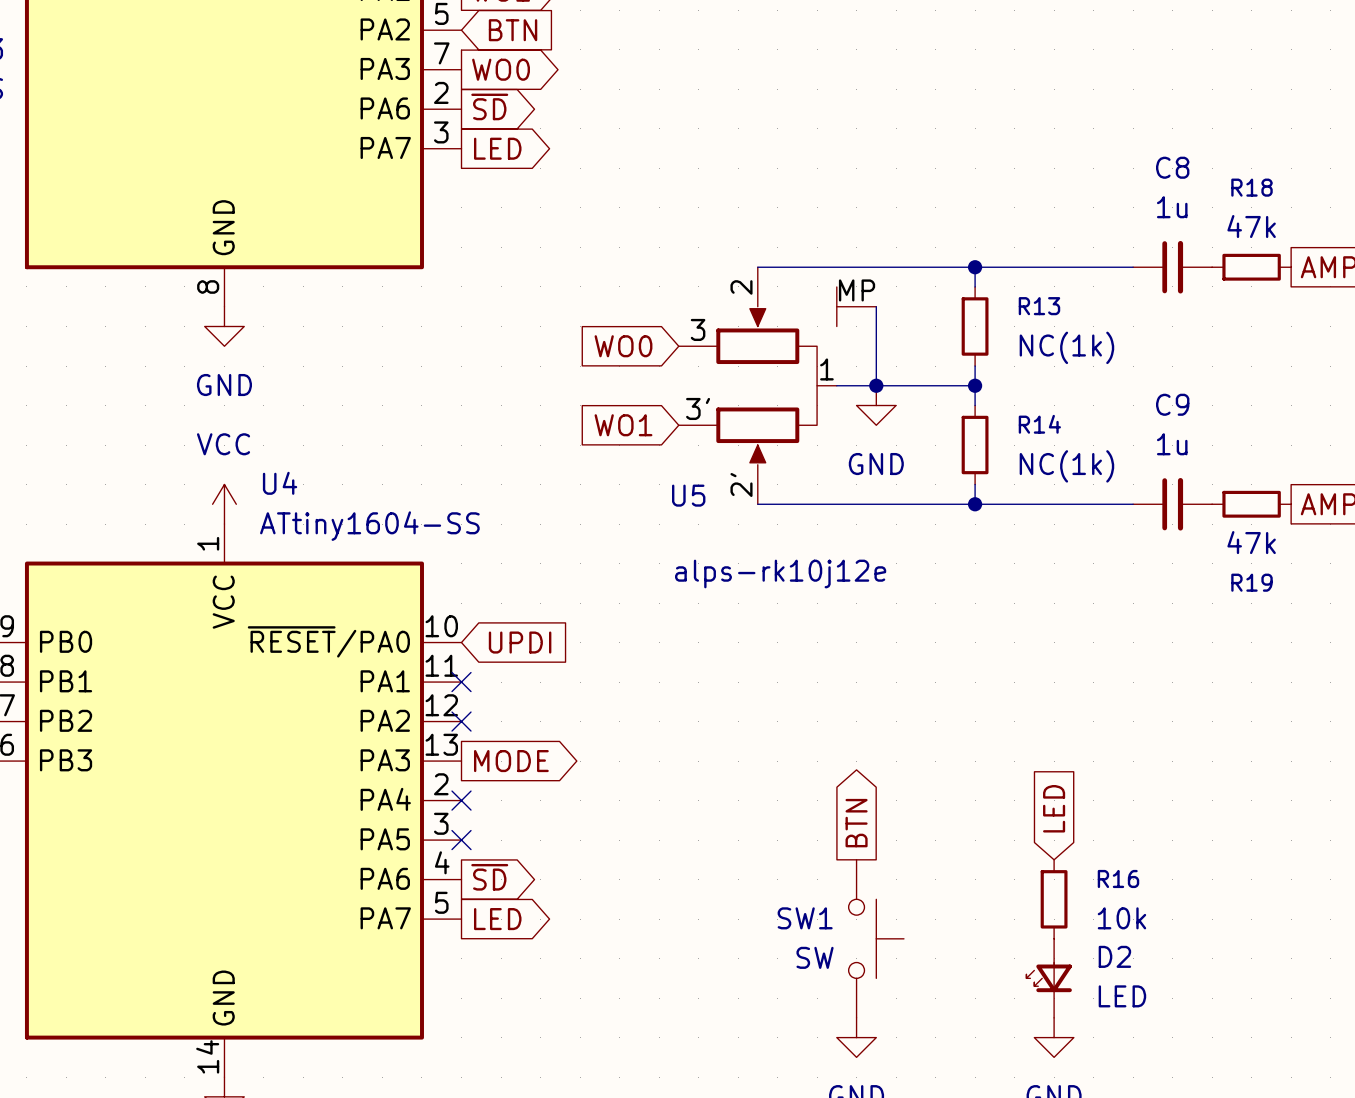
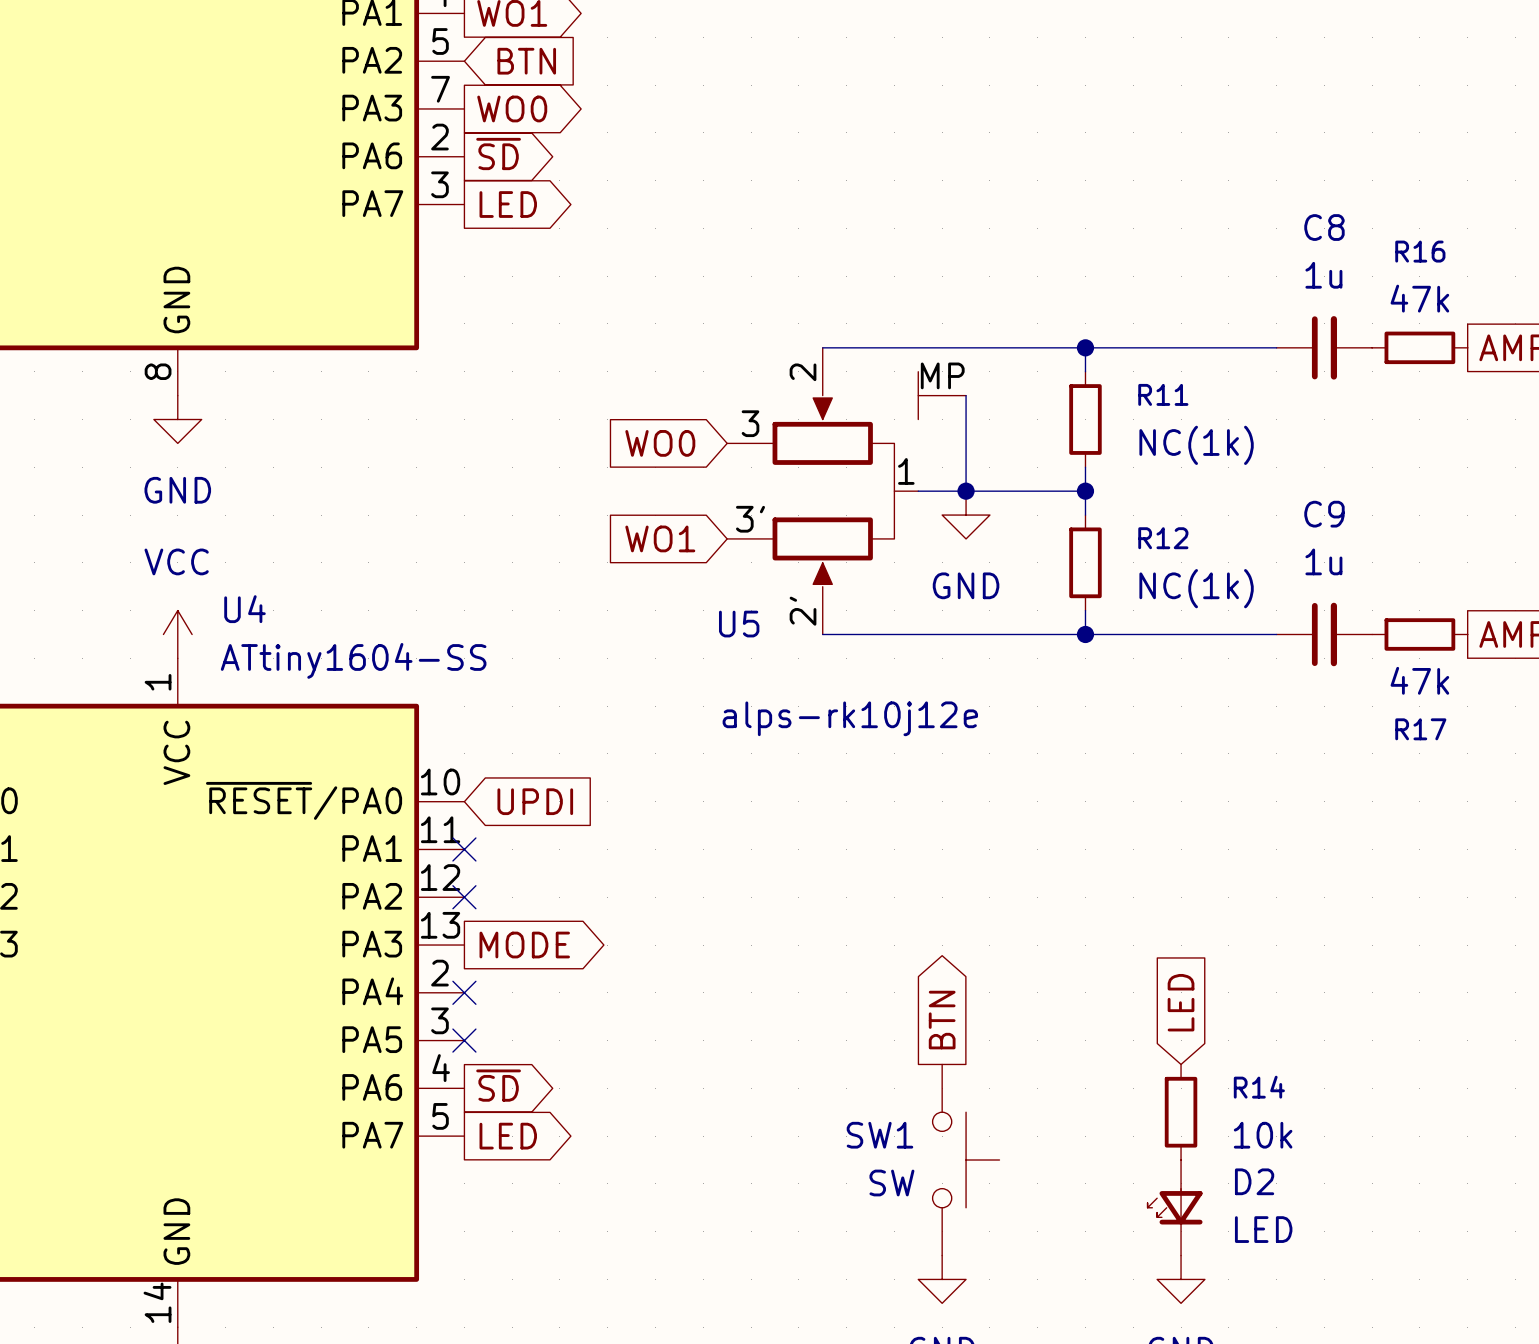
R18 name: R18 (1251, 187) -> R16 (1420, 251)
R13 name: R13 (1039, 306) -> R11 (1163, 394)
R14 name: R14 (1039, 424) -> R12 (1163, 538)
R19 name: R19 (1251, 582) -> R17 (1420, 729)
R16 name: R16 (1118, 878) -> R14 (1259, 1087)

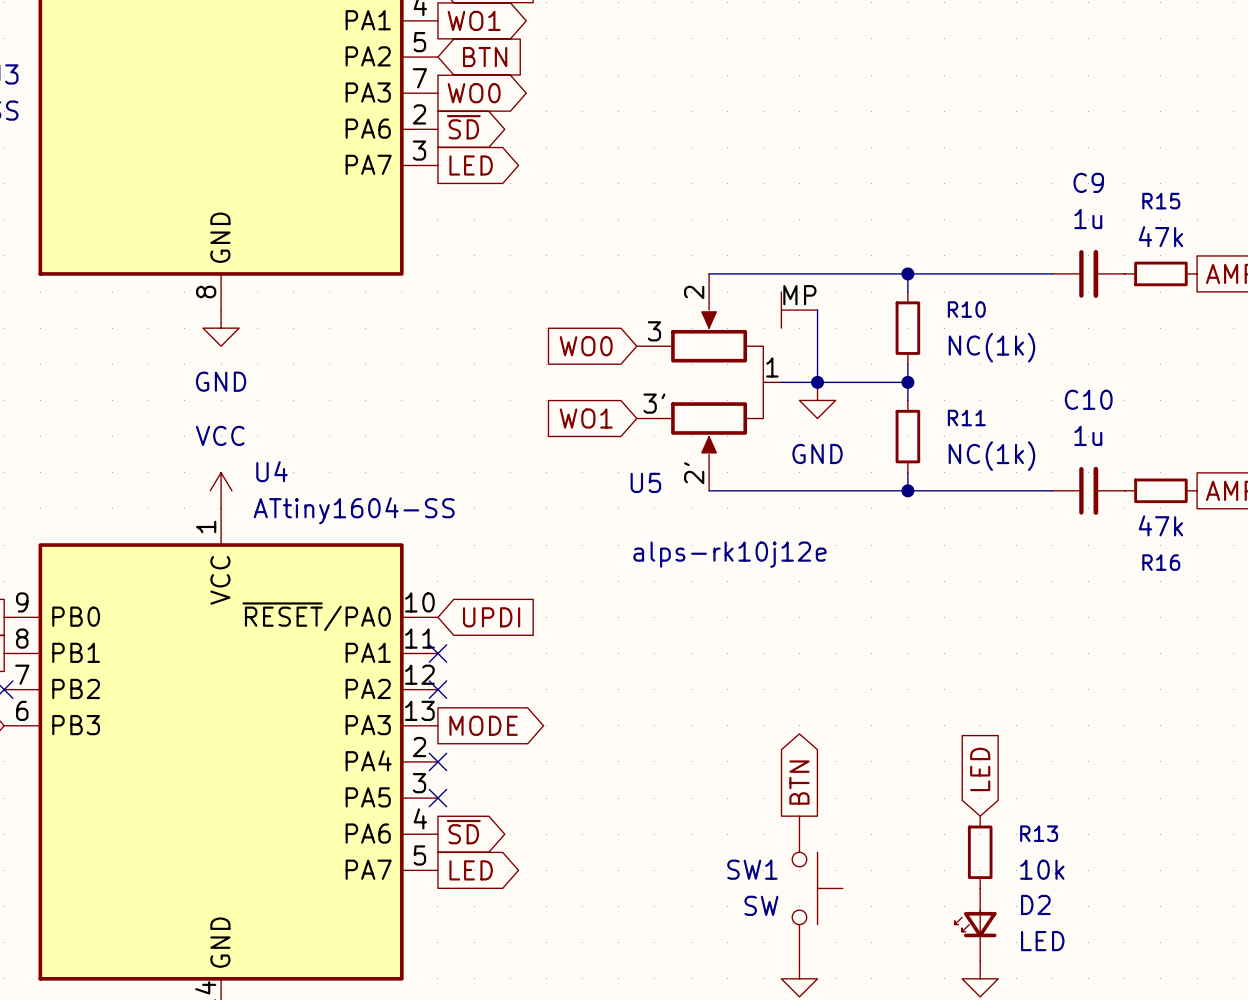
C8 name: C8 (1324, 227) -> C9 (1088, 182)
R16 name: R16 (1420, 251) -> R15 (1161, 201)
R11 name: R11 (1163, 394) -> R10 (966, 309)
C9 name: C9 (1324, 514) -> C10 (1088, 399)
R12 name: R12 (1163, 538) -> R11 (966, 417)
R17 name: R17 (1420, 729) -> R16 (1161, 562)
R14 name: R14 (1259, 1087) -> R13 (1039, 833)

